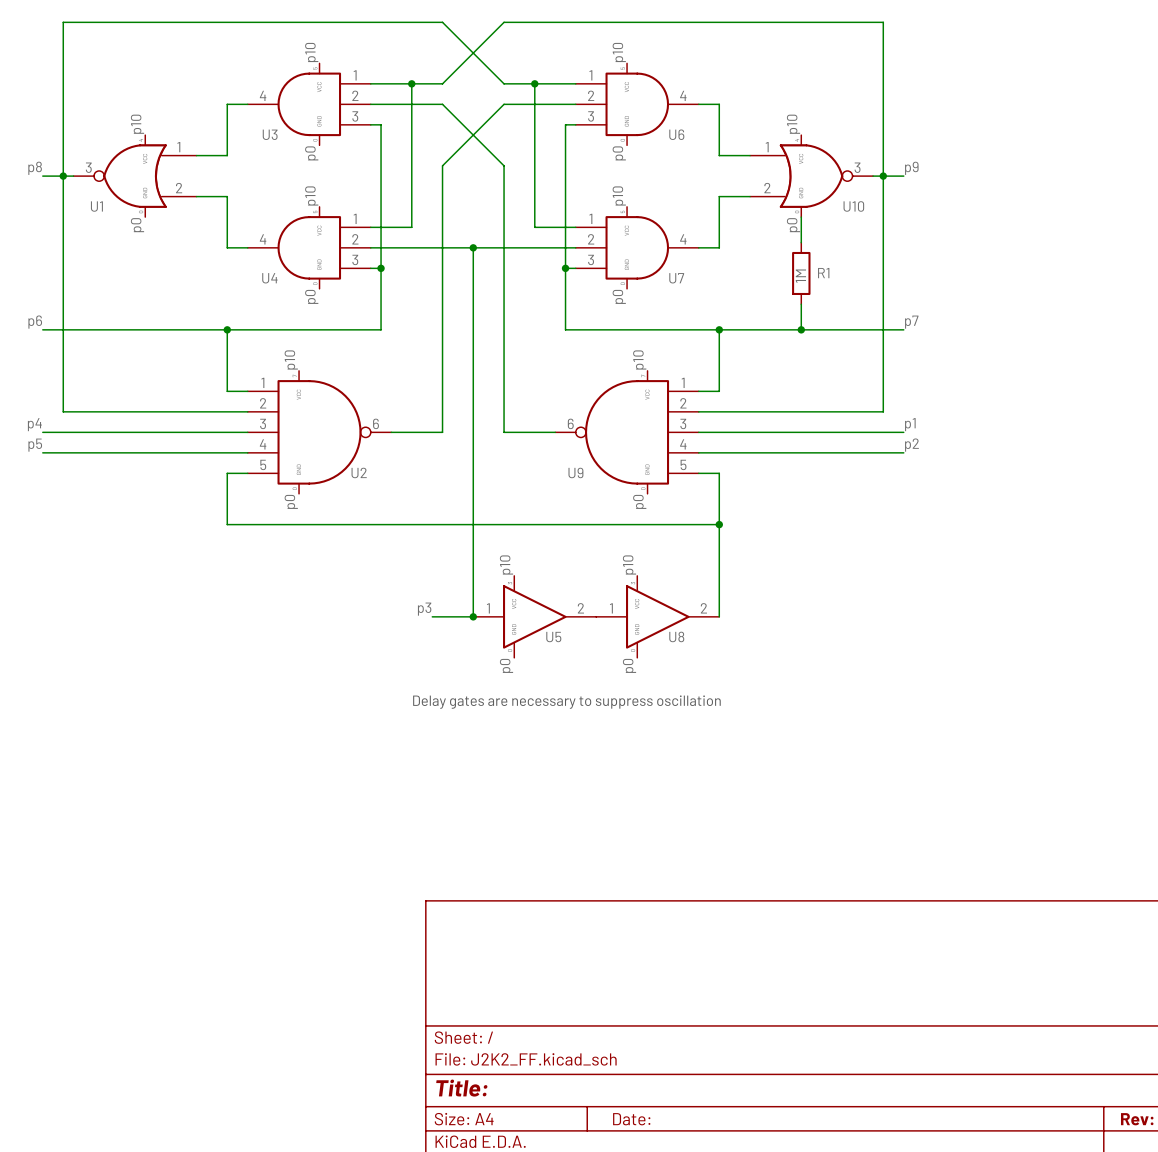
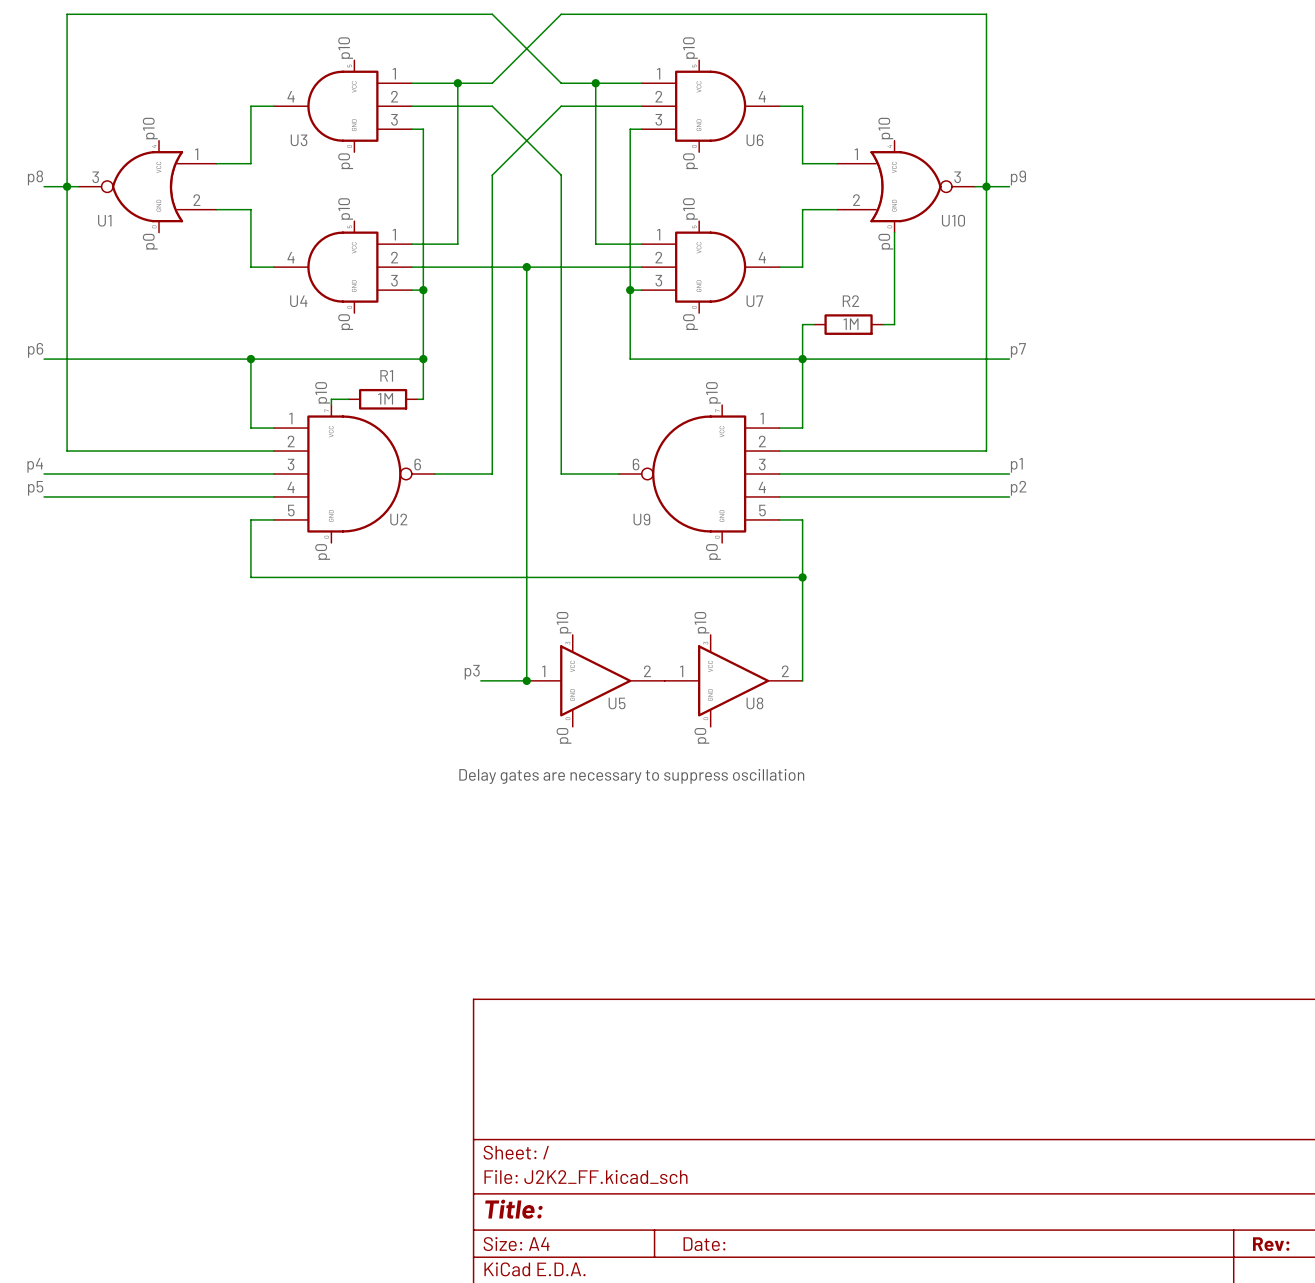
wire: none -> (894, 261) (894, 324) (883, 324)
R1 rotation: 0° (801, 273) -> 90° clockwise (383, 399)
R1 position: (801, 273) -> (383, 399)
R1 name position: R1 (823, 273) -> R1 (386, 375)
wire: none -> (814, 324) (802, 324) (802, 359)
R2: none -> 1M (848, 324)
wire: (801, 304) (801, 329) -> none
wire: none -> (423, 359) (423, 399) (417, 399)
junction: none -> (423, 359)
junction: (801, 329) -> none
wire: none -> (348, 399) (331, 399) (331, 405)

